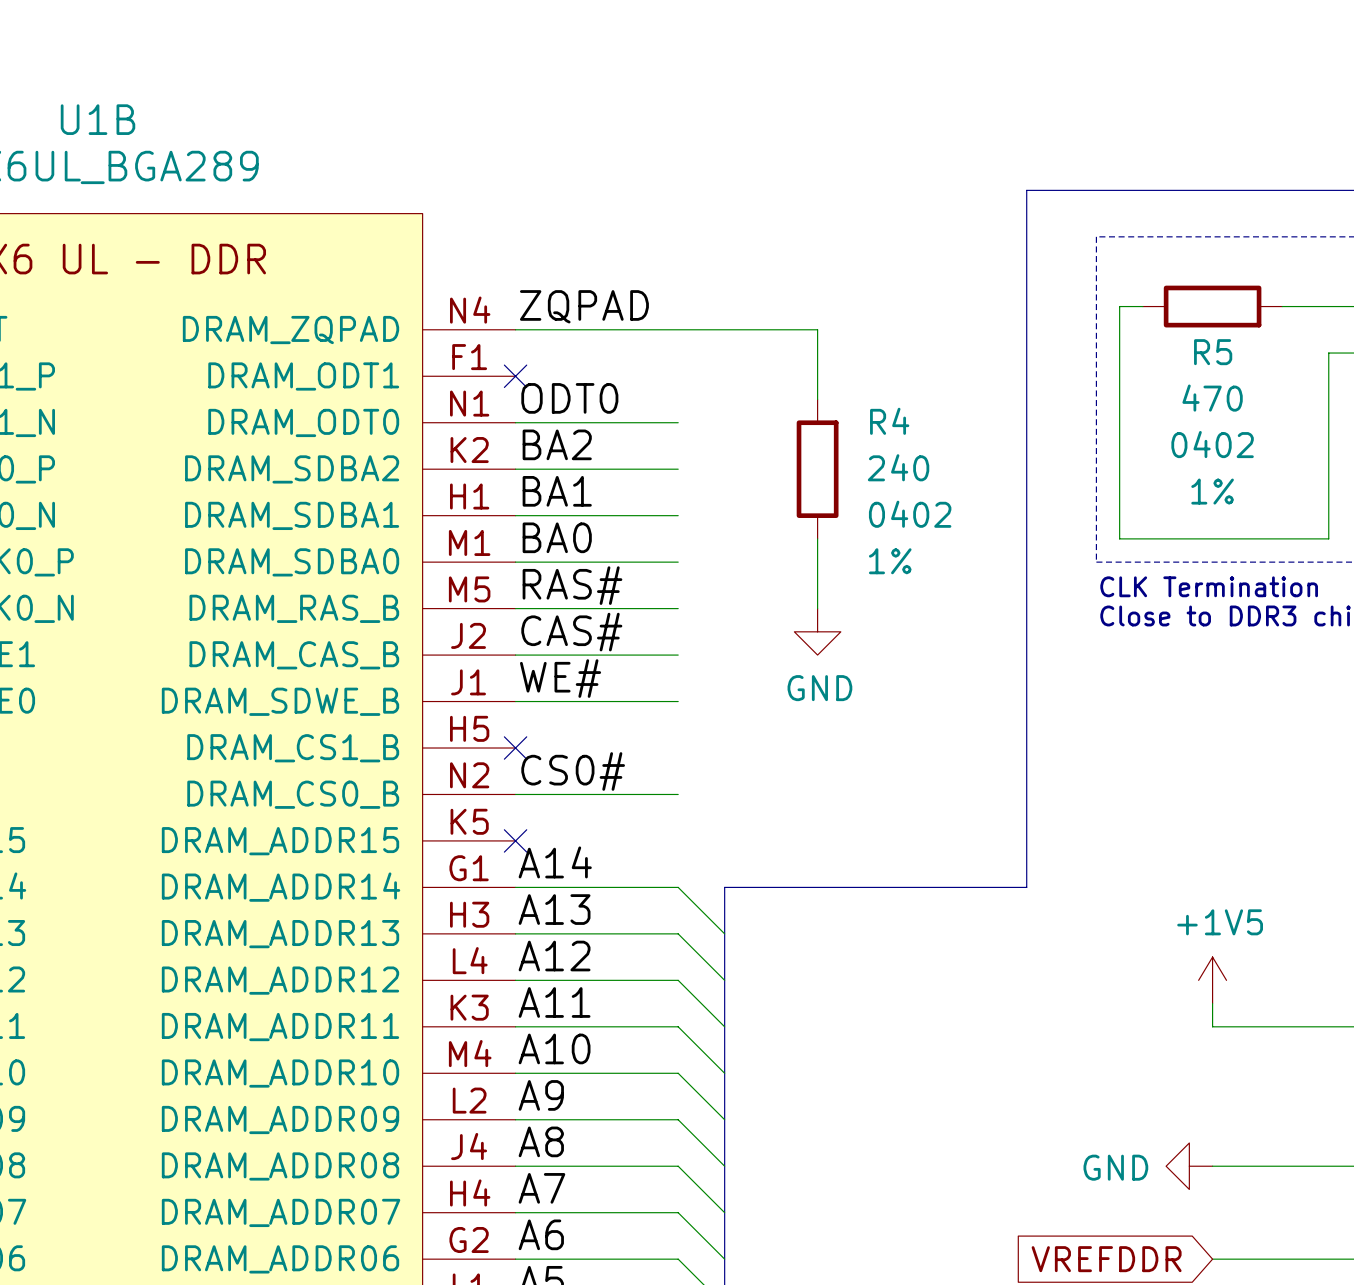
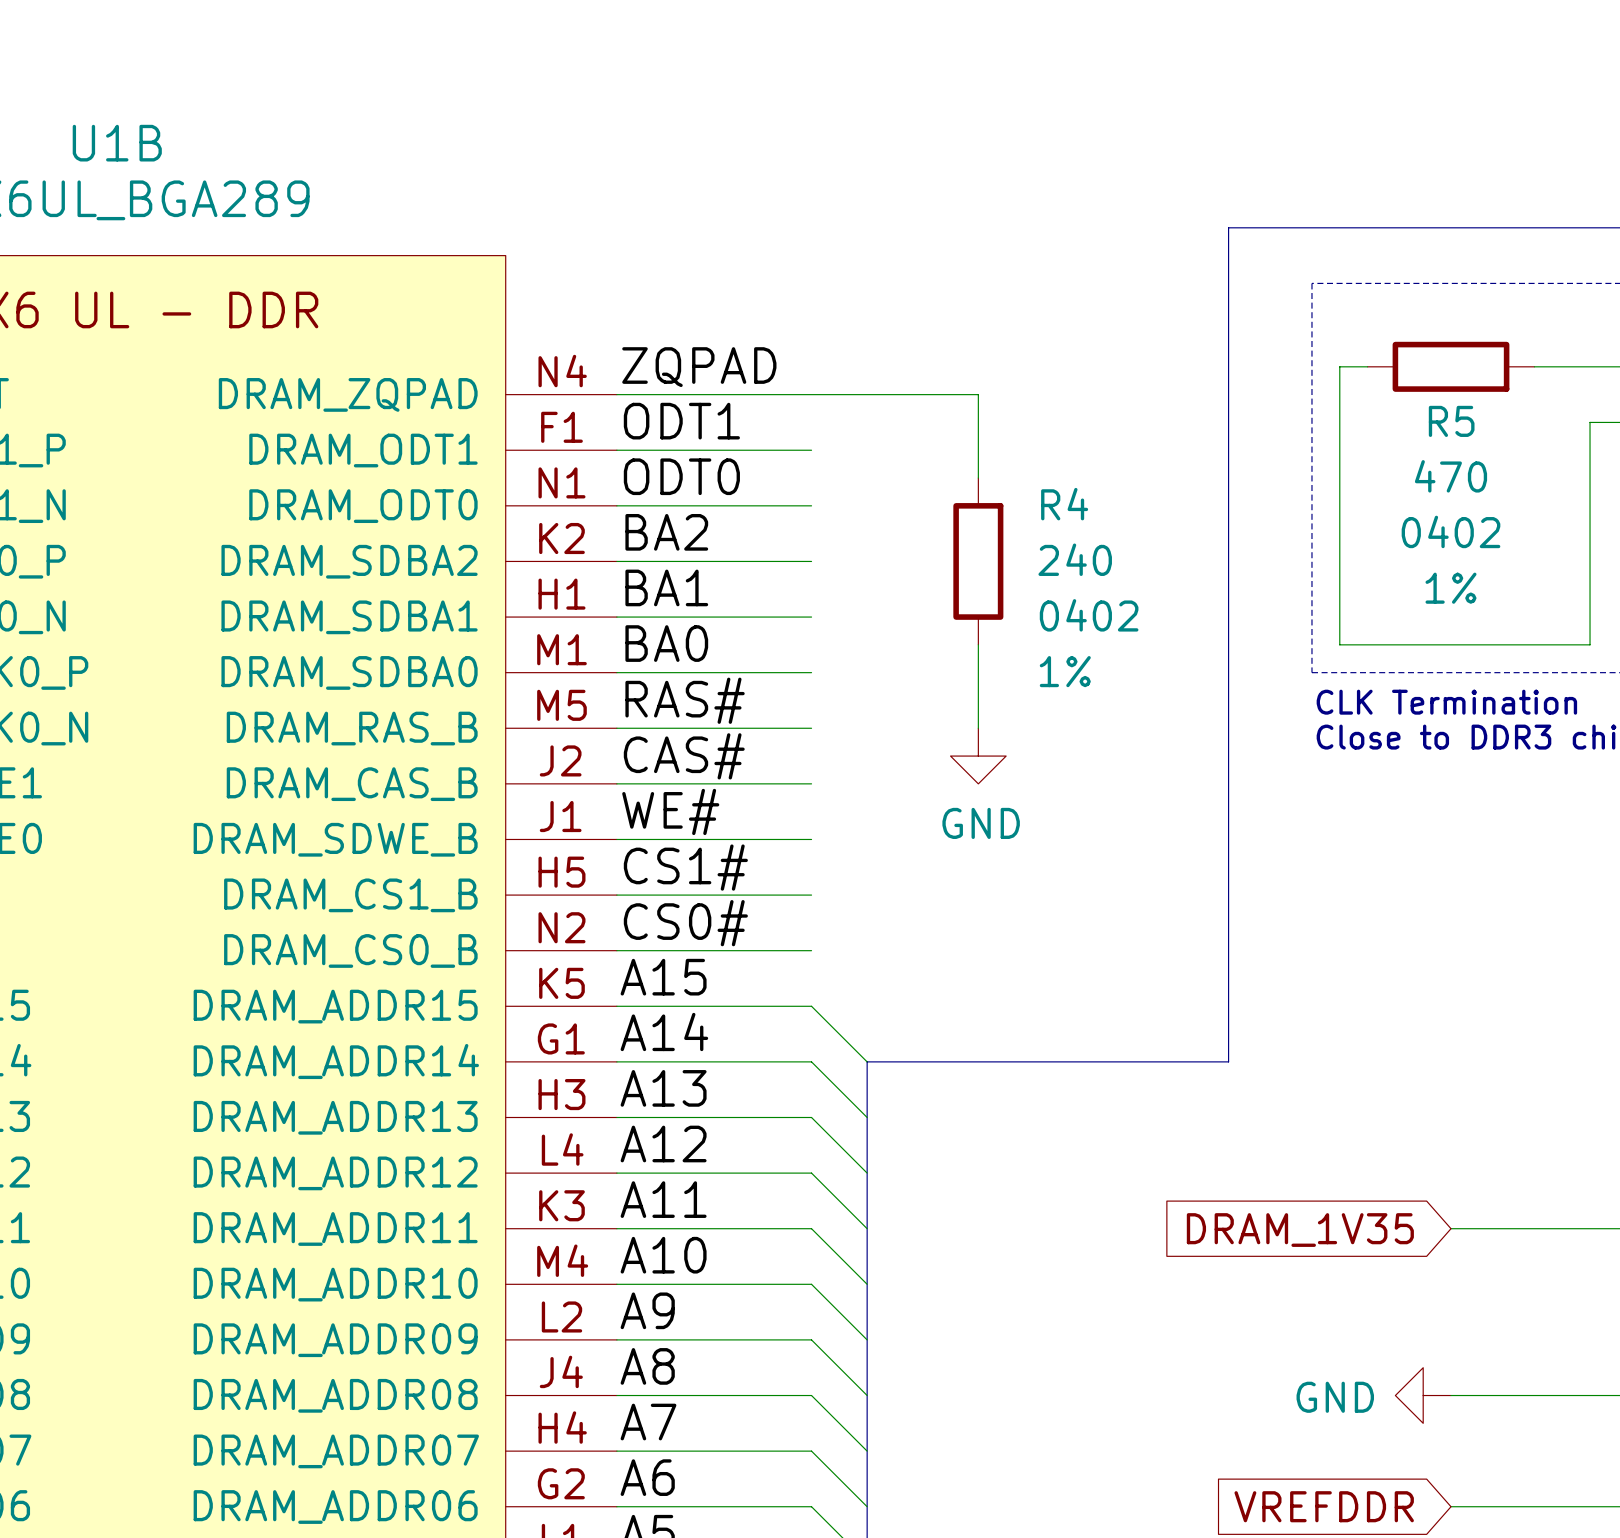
label: none -> ODT1 (681, 421)
wire: none -> (616, 450) (811, 450)
no-connect mark: (515, 376) -> none
label: none -> CS1# (685, 867)
wire: none -> (616, 895) (811, 895)
no-connect mark: (515, 748) -> none
label: none -> A15 (663, 977)
wire: none -> (616, 1006) (811, 1006) (867, 1061)
no-connect mark: (515, 840) -> none
power symbol: +1V5 (1212, 980) -> none
wire: (1212, 1003) (1212, 1026) -> none
global label: none -> DRAM_1V35 (1300, 1230)

